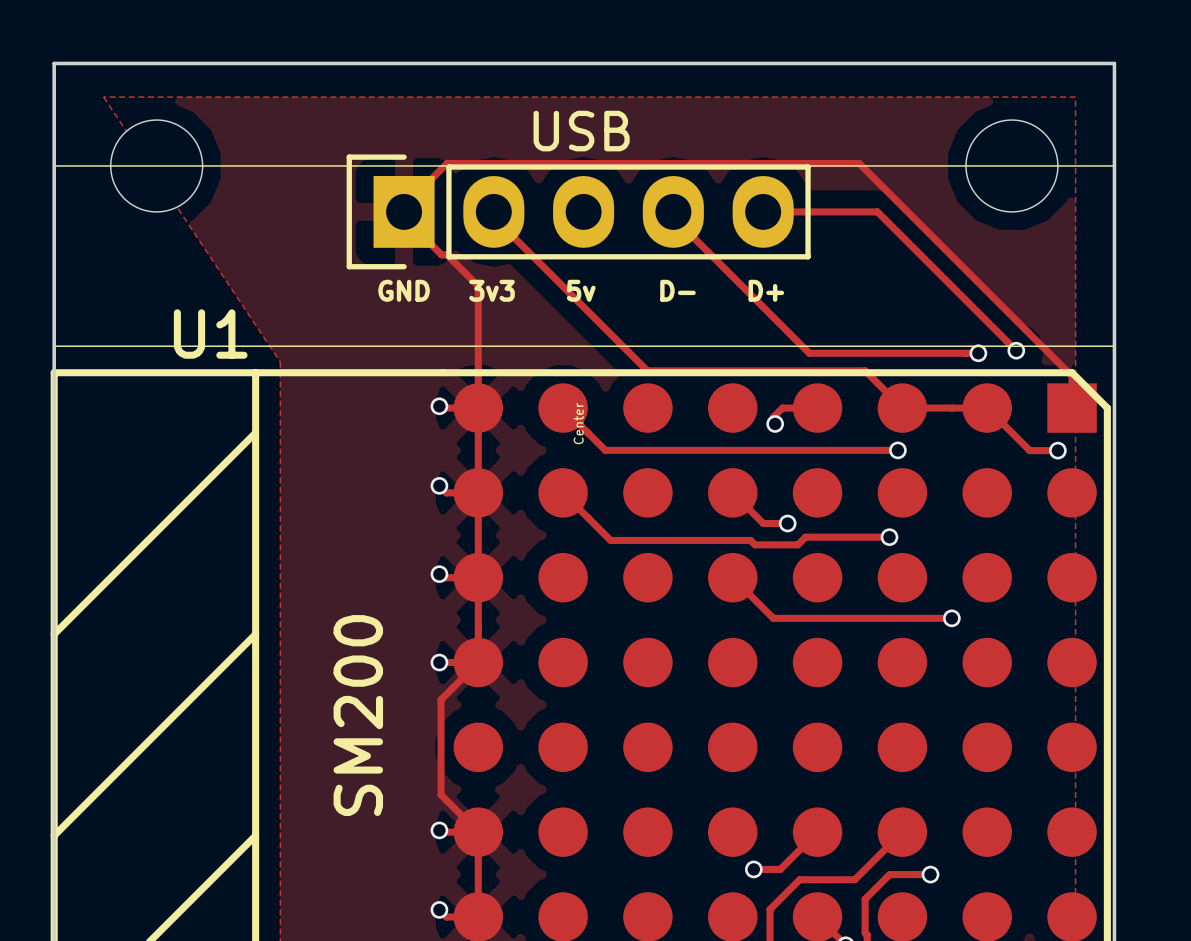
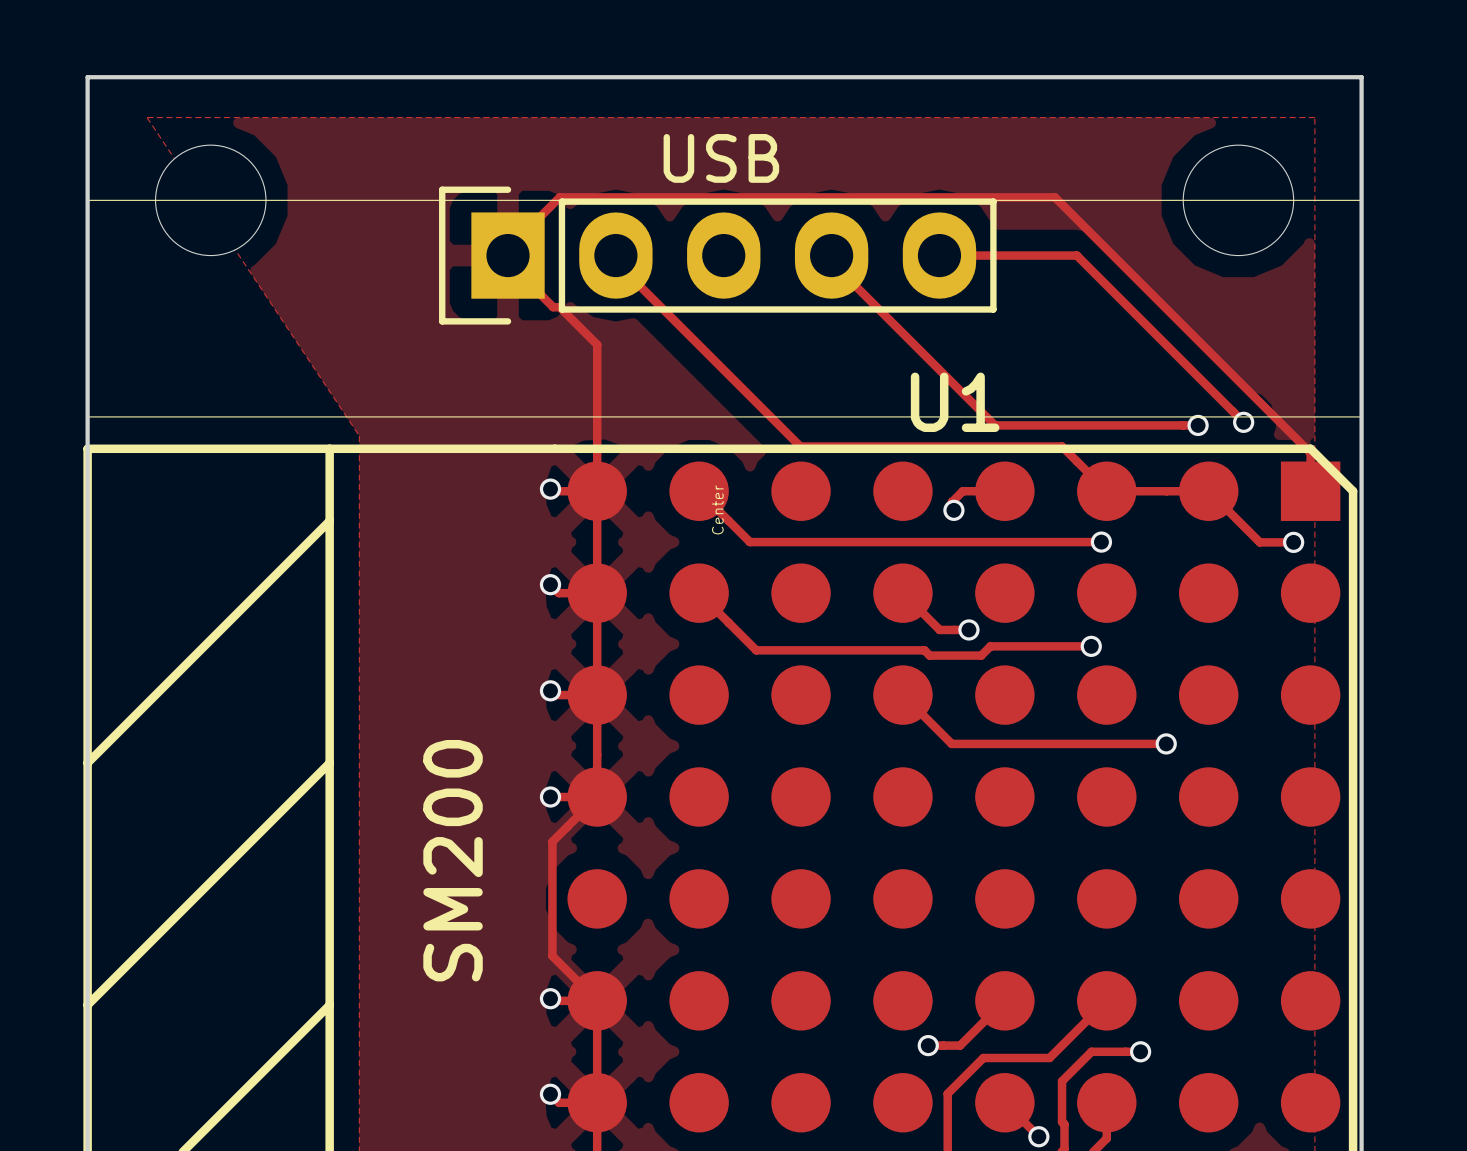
text: GND (404, 290) -> none
text: 3v3 (492, 290) -> none
text: 5v (581, 290) -> none
text: D- (677, 290) -> none
text: D+ (766, 290) -> none
U1 name position: U1 (210, 334) -> U1 (955, 402)

